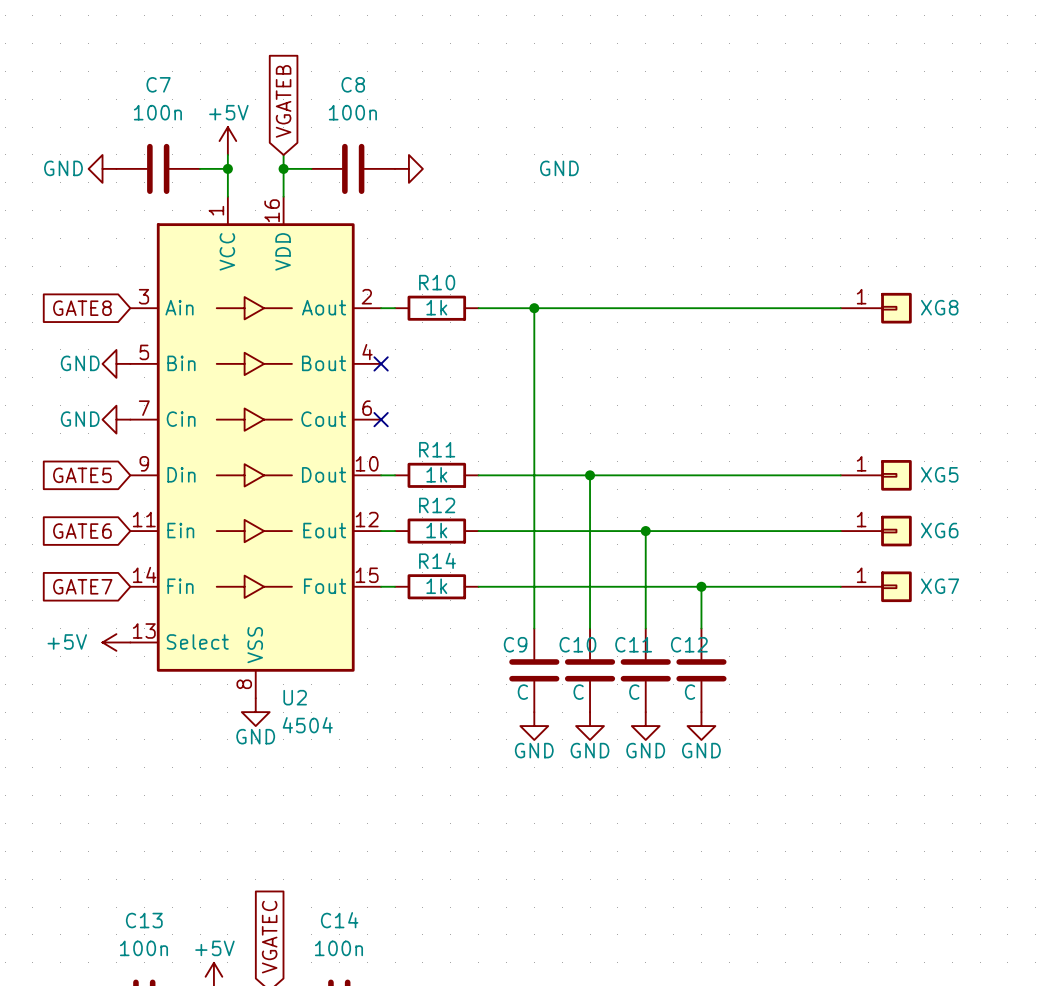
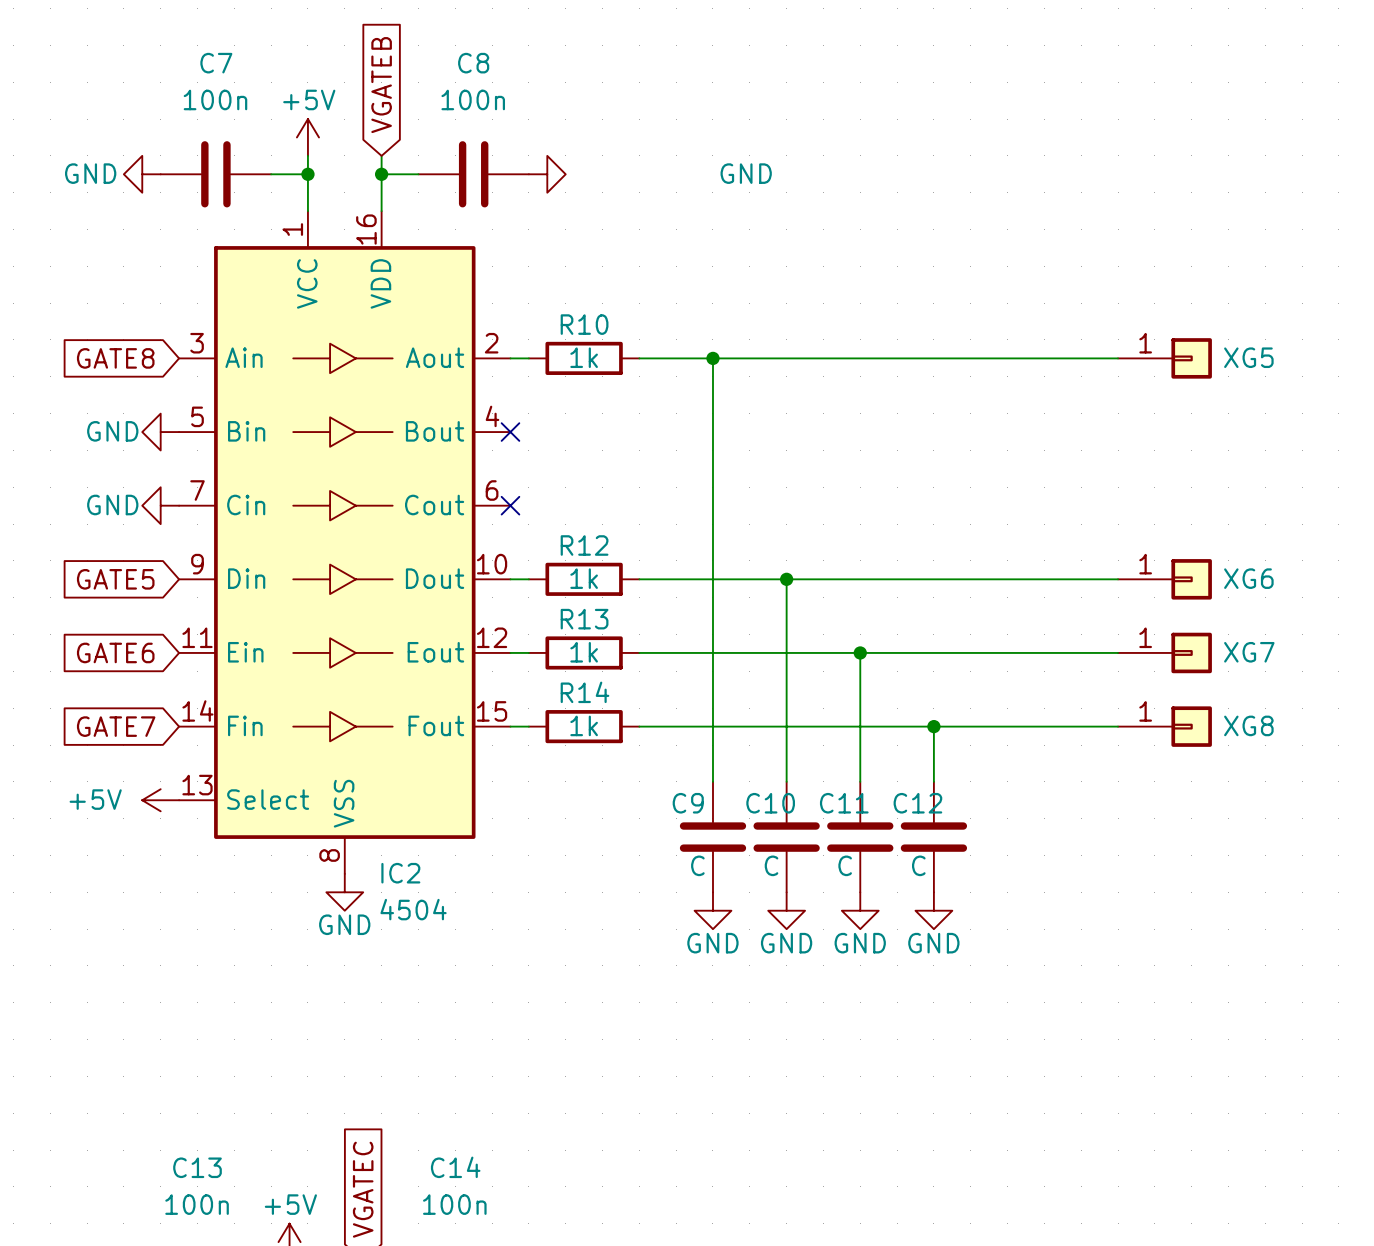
XG8 name: XG8 (939, 307) -> XG5 (1248, 357)
R11 name: R11 (437, 449) -> R12 (584, 545)
XG5 name: XG5 (939, 474) -> XG6 (1248, 578)
R12 name: R12 (437, 505) -> R13 (584, 619)
XG6 name: XG6 (939, 530) -> XG7 (1249, 652)
XG7 name: XG7 (940, 586) -> XG8 (1248, 725)
U2 name: U2 (295, 697) -> IC2 (400, 873)

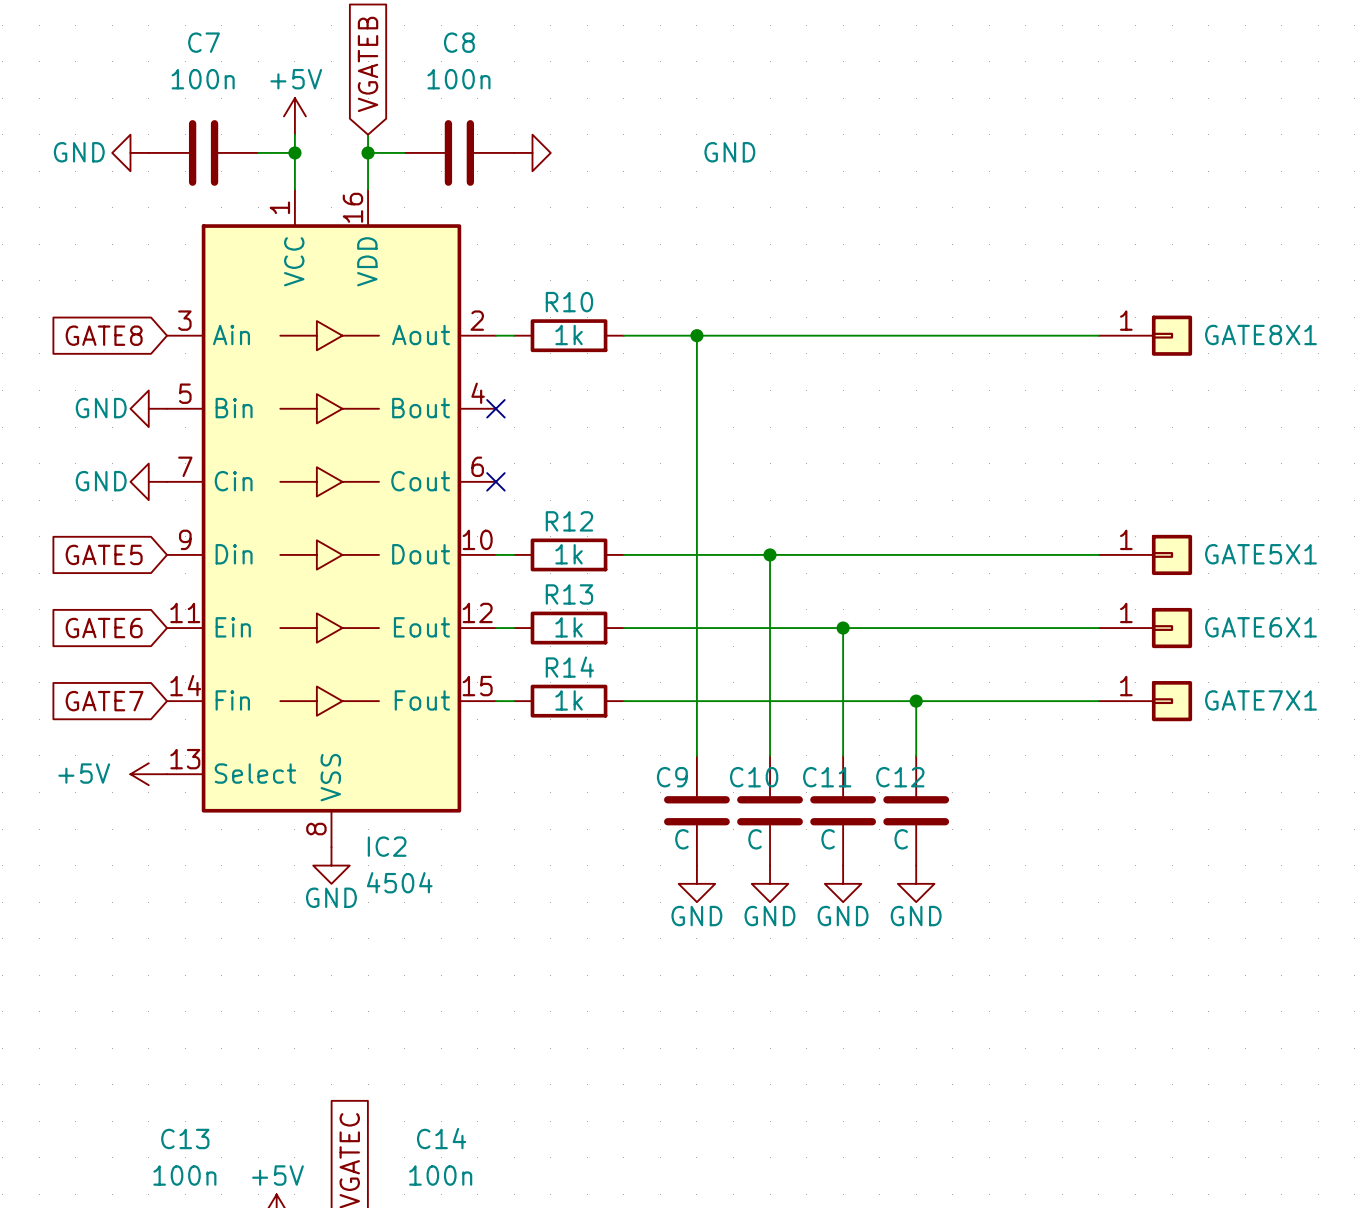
XG5 name: XG5 (1248, 357) -> GATE8X1 (1260, 335)
XG6 name: XG6 (1248, 578) -> GATE5X1 (1260, 554)
XG7 name: XG7 (1249, 652) -> GATE6X1 (1260, 627)
XG8 name: XG8 (1248, 725) -> GATE7X1 (1260, 700)

